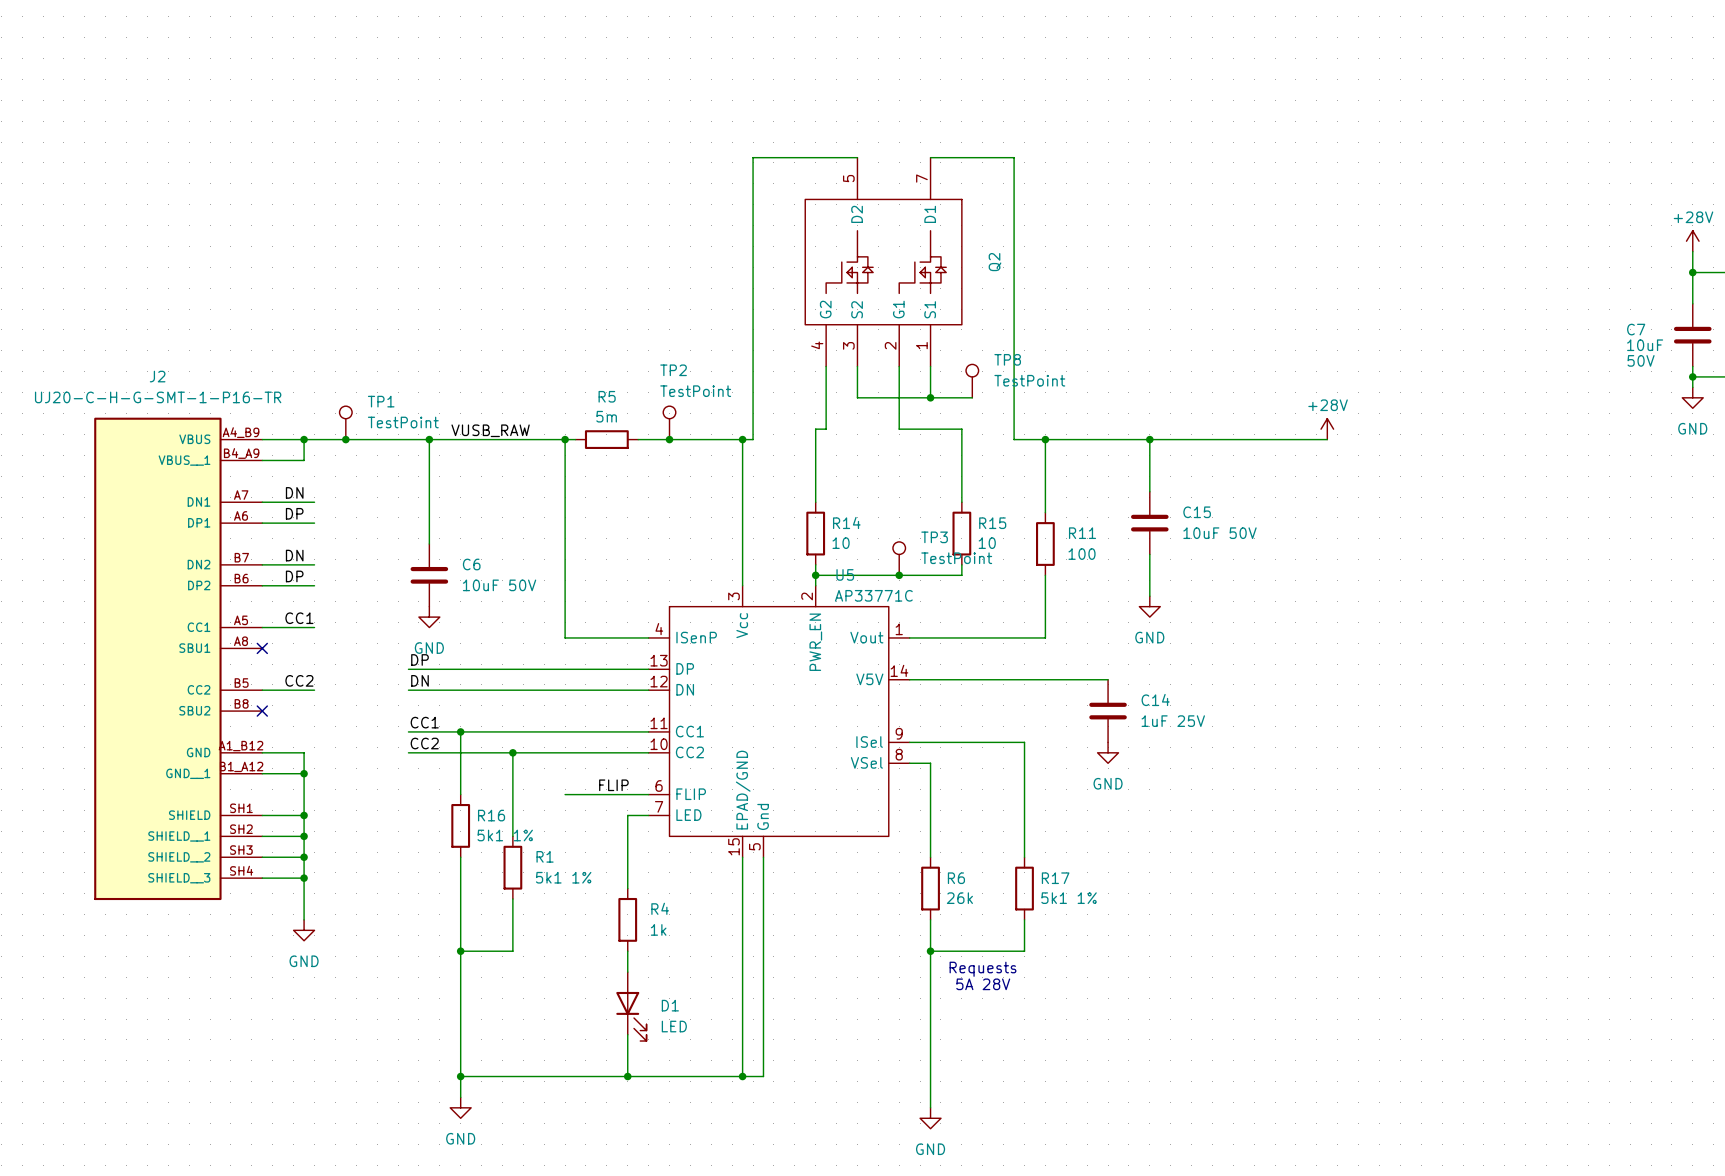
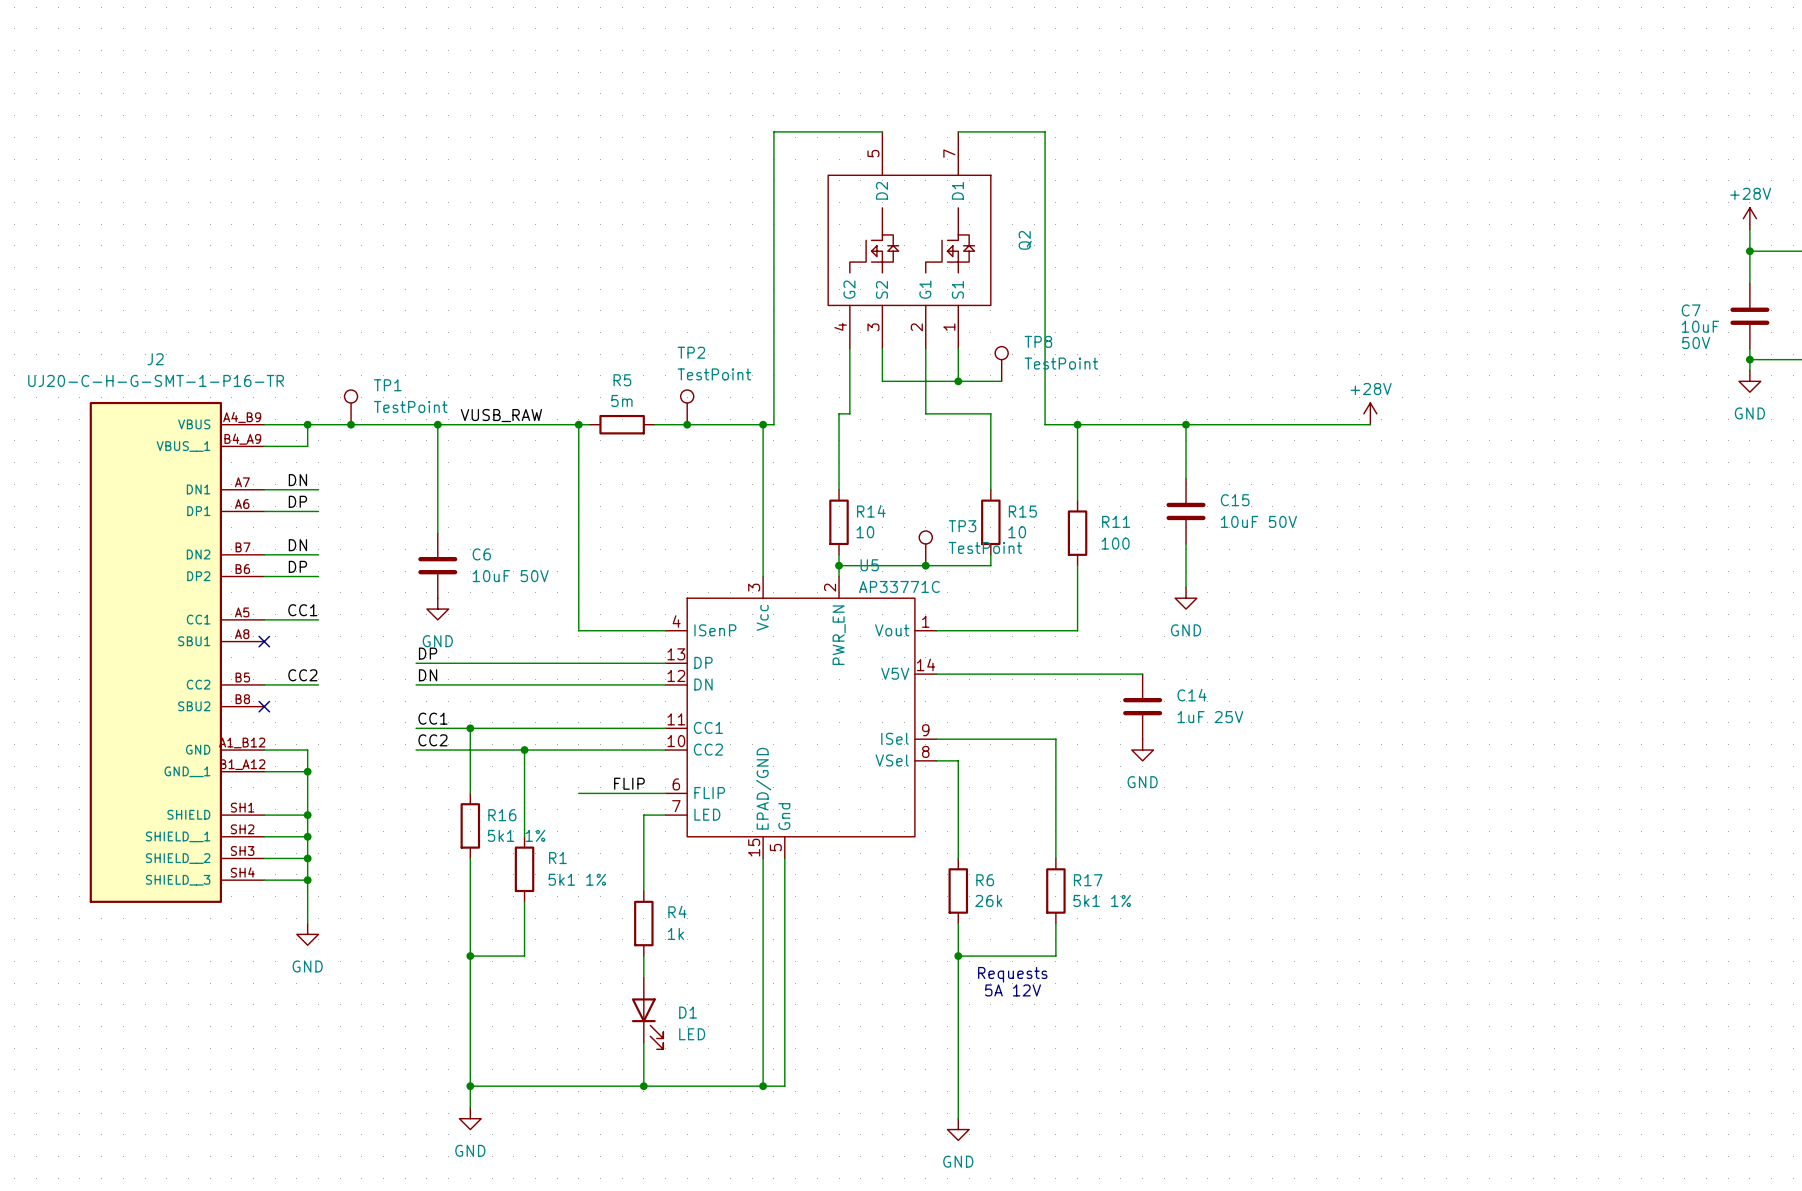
text: 5A 28V (983, 984) -> 5A 12V (1013, 990)

